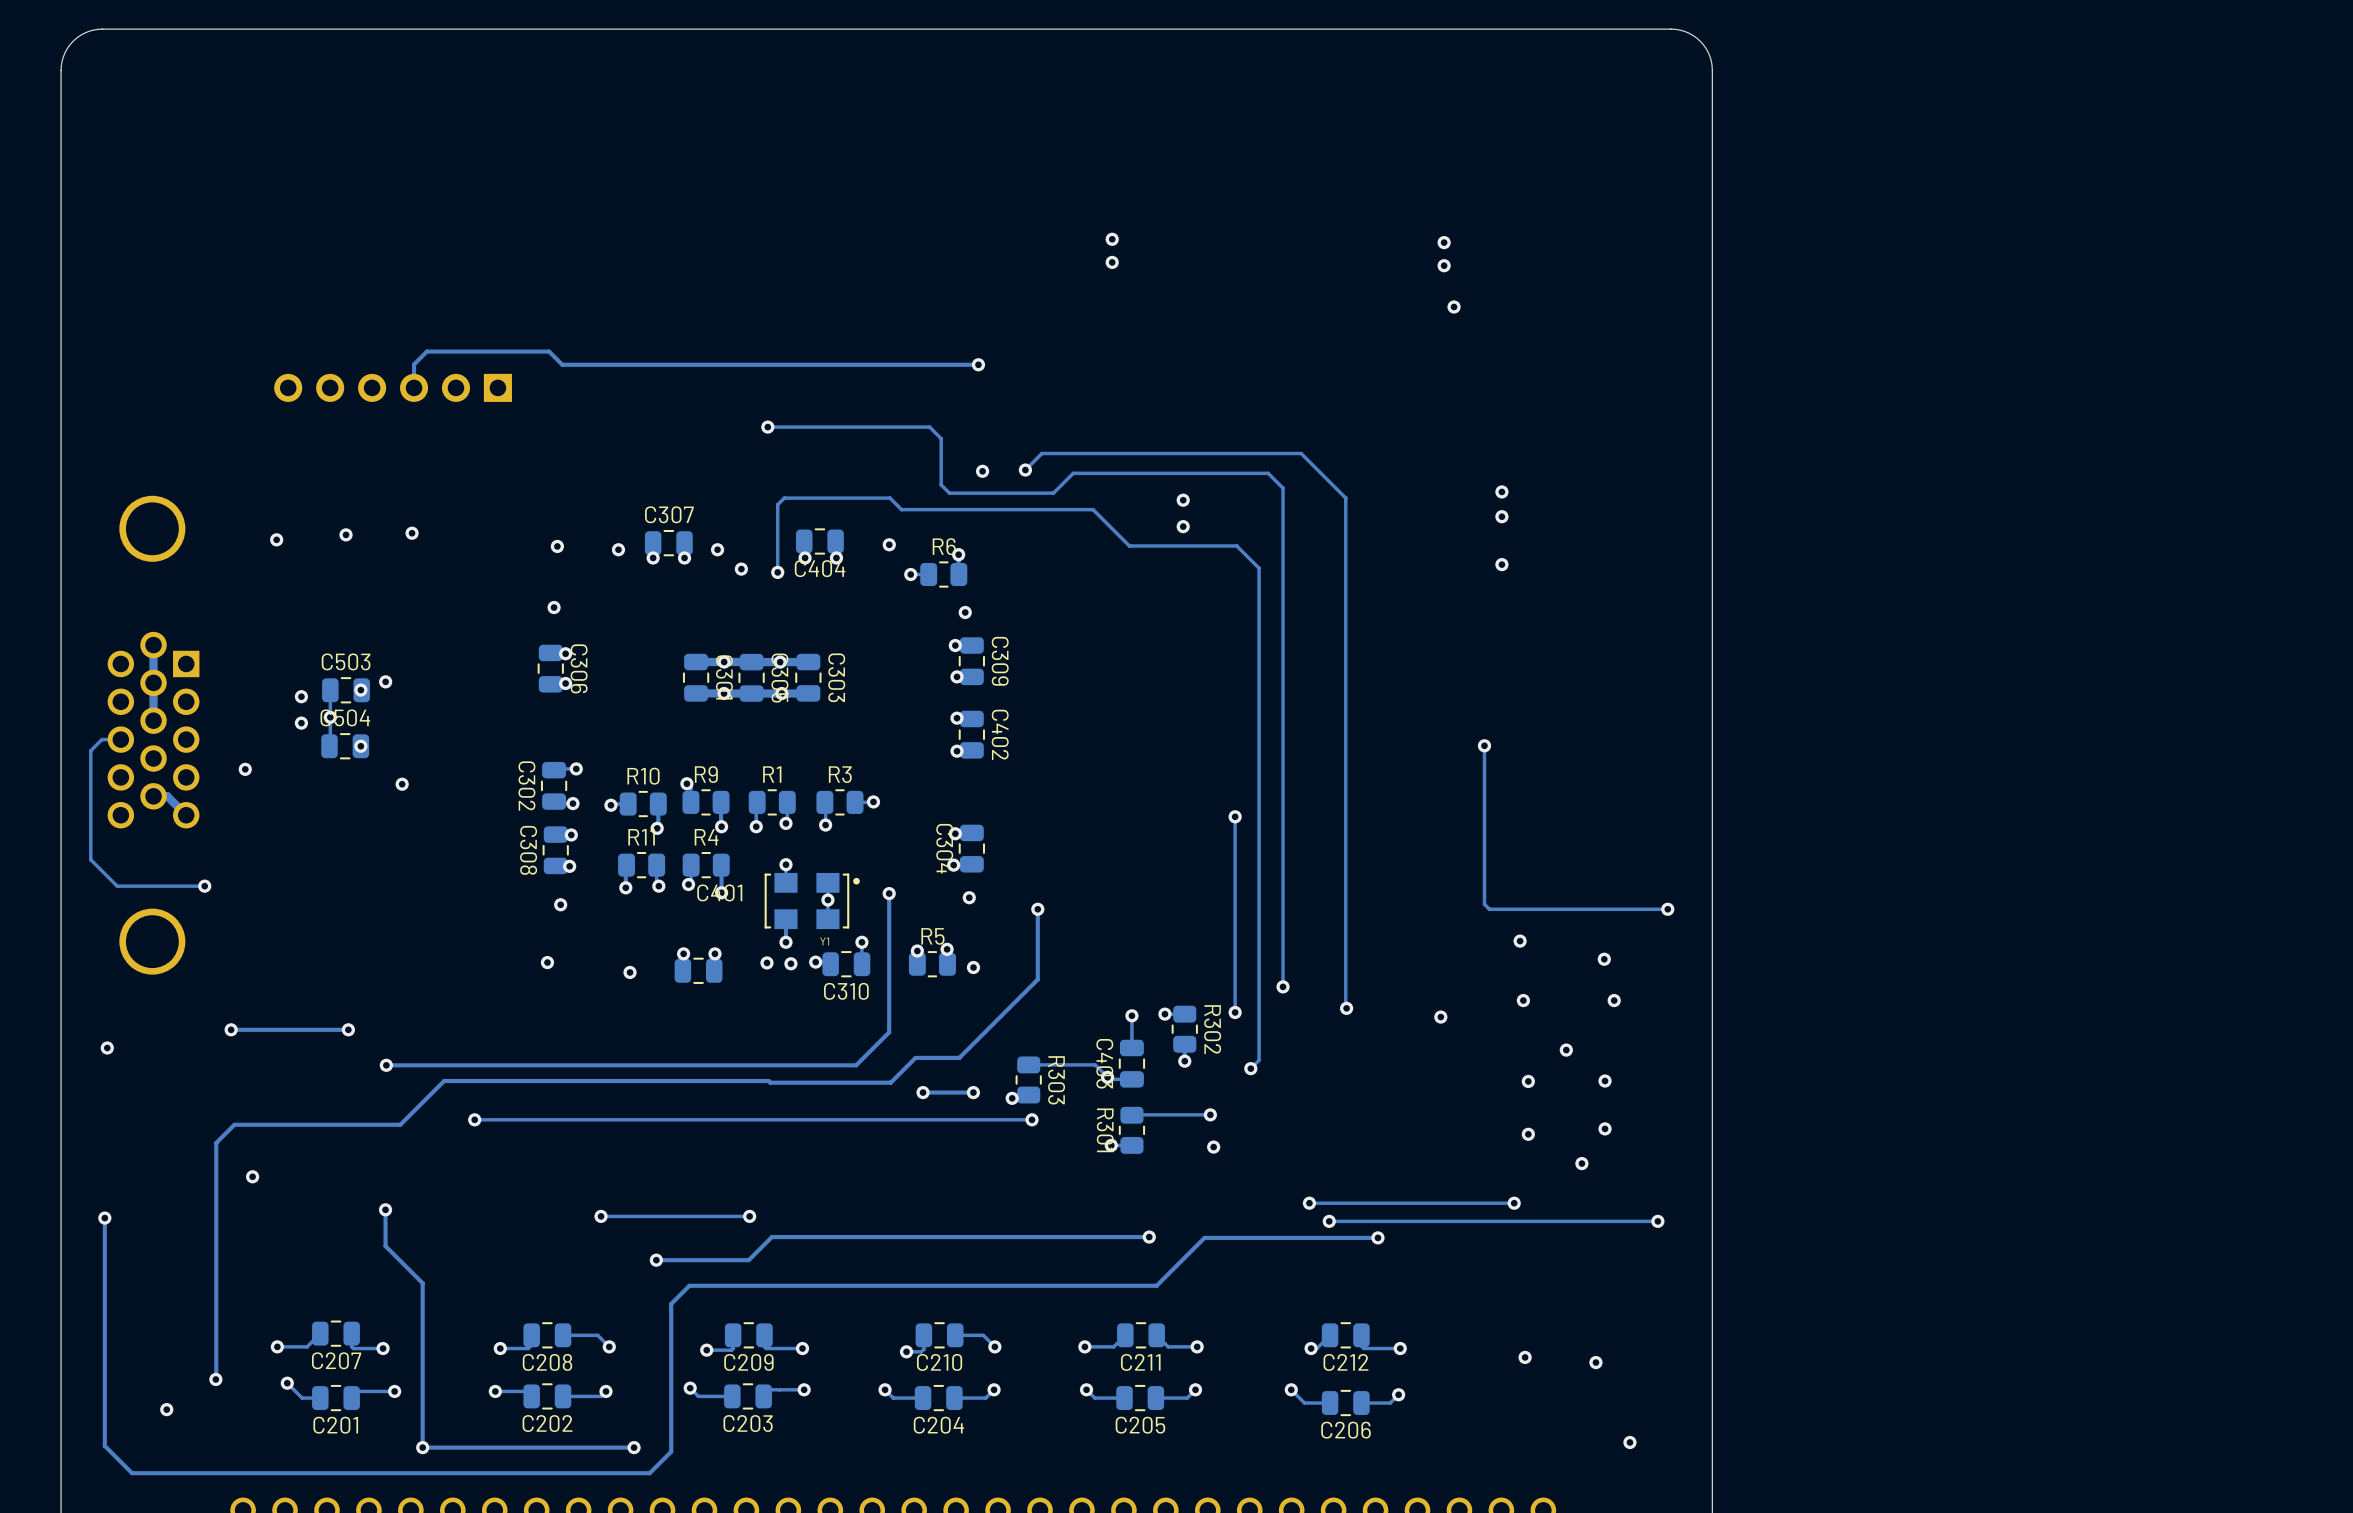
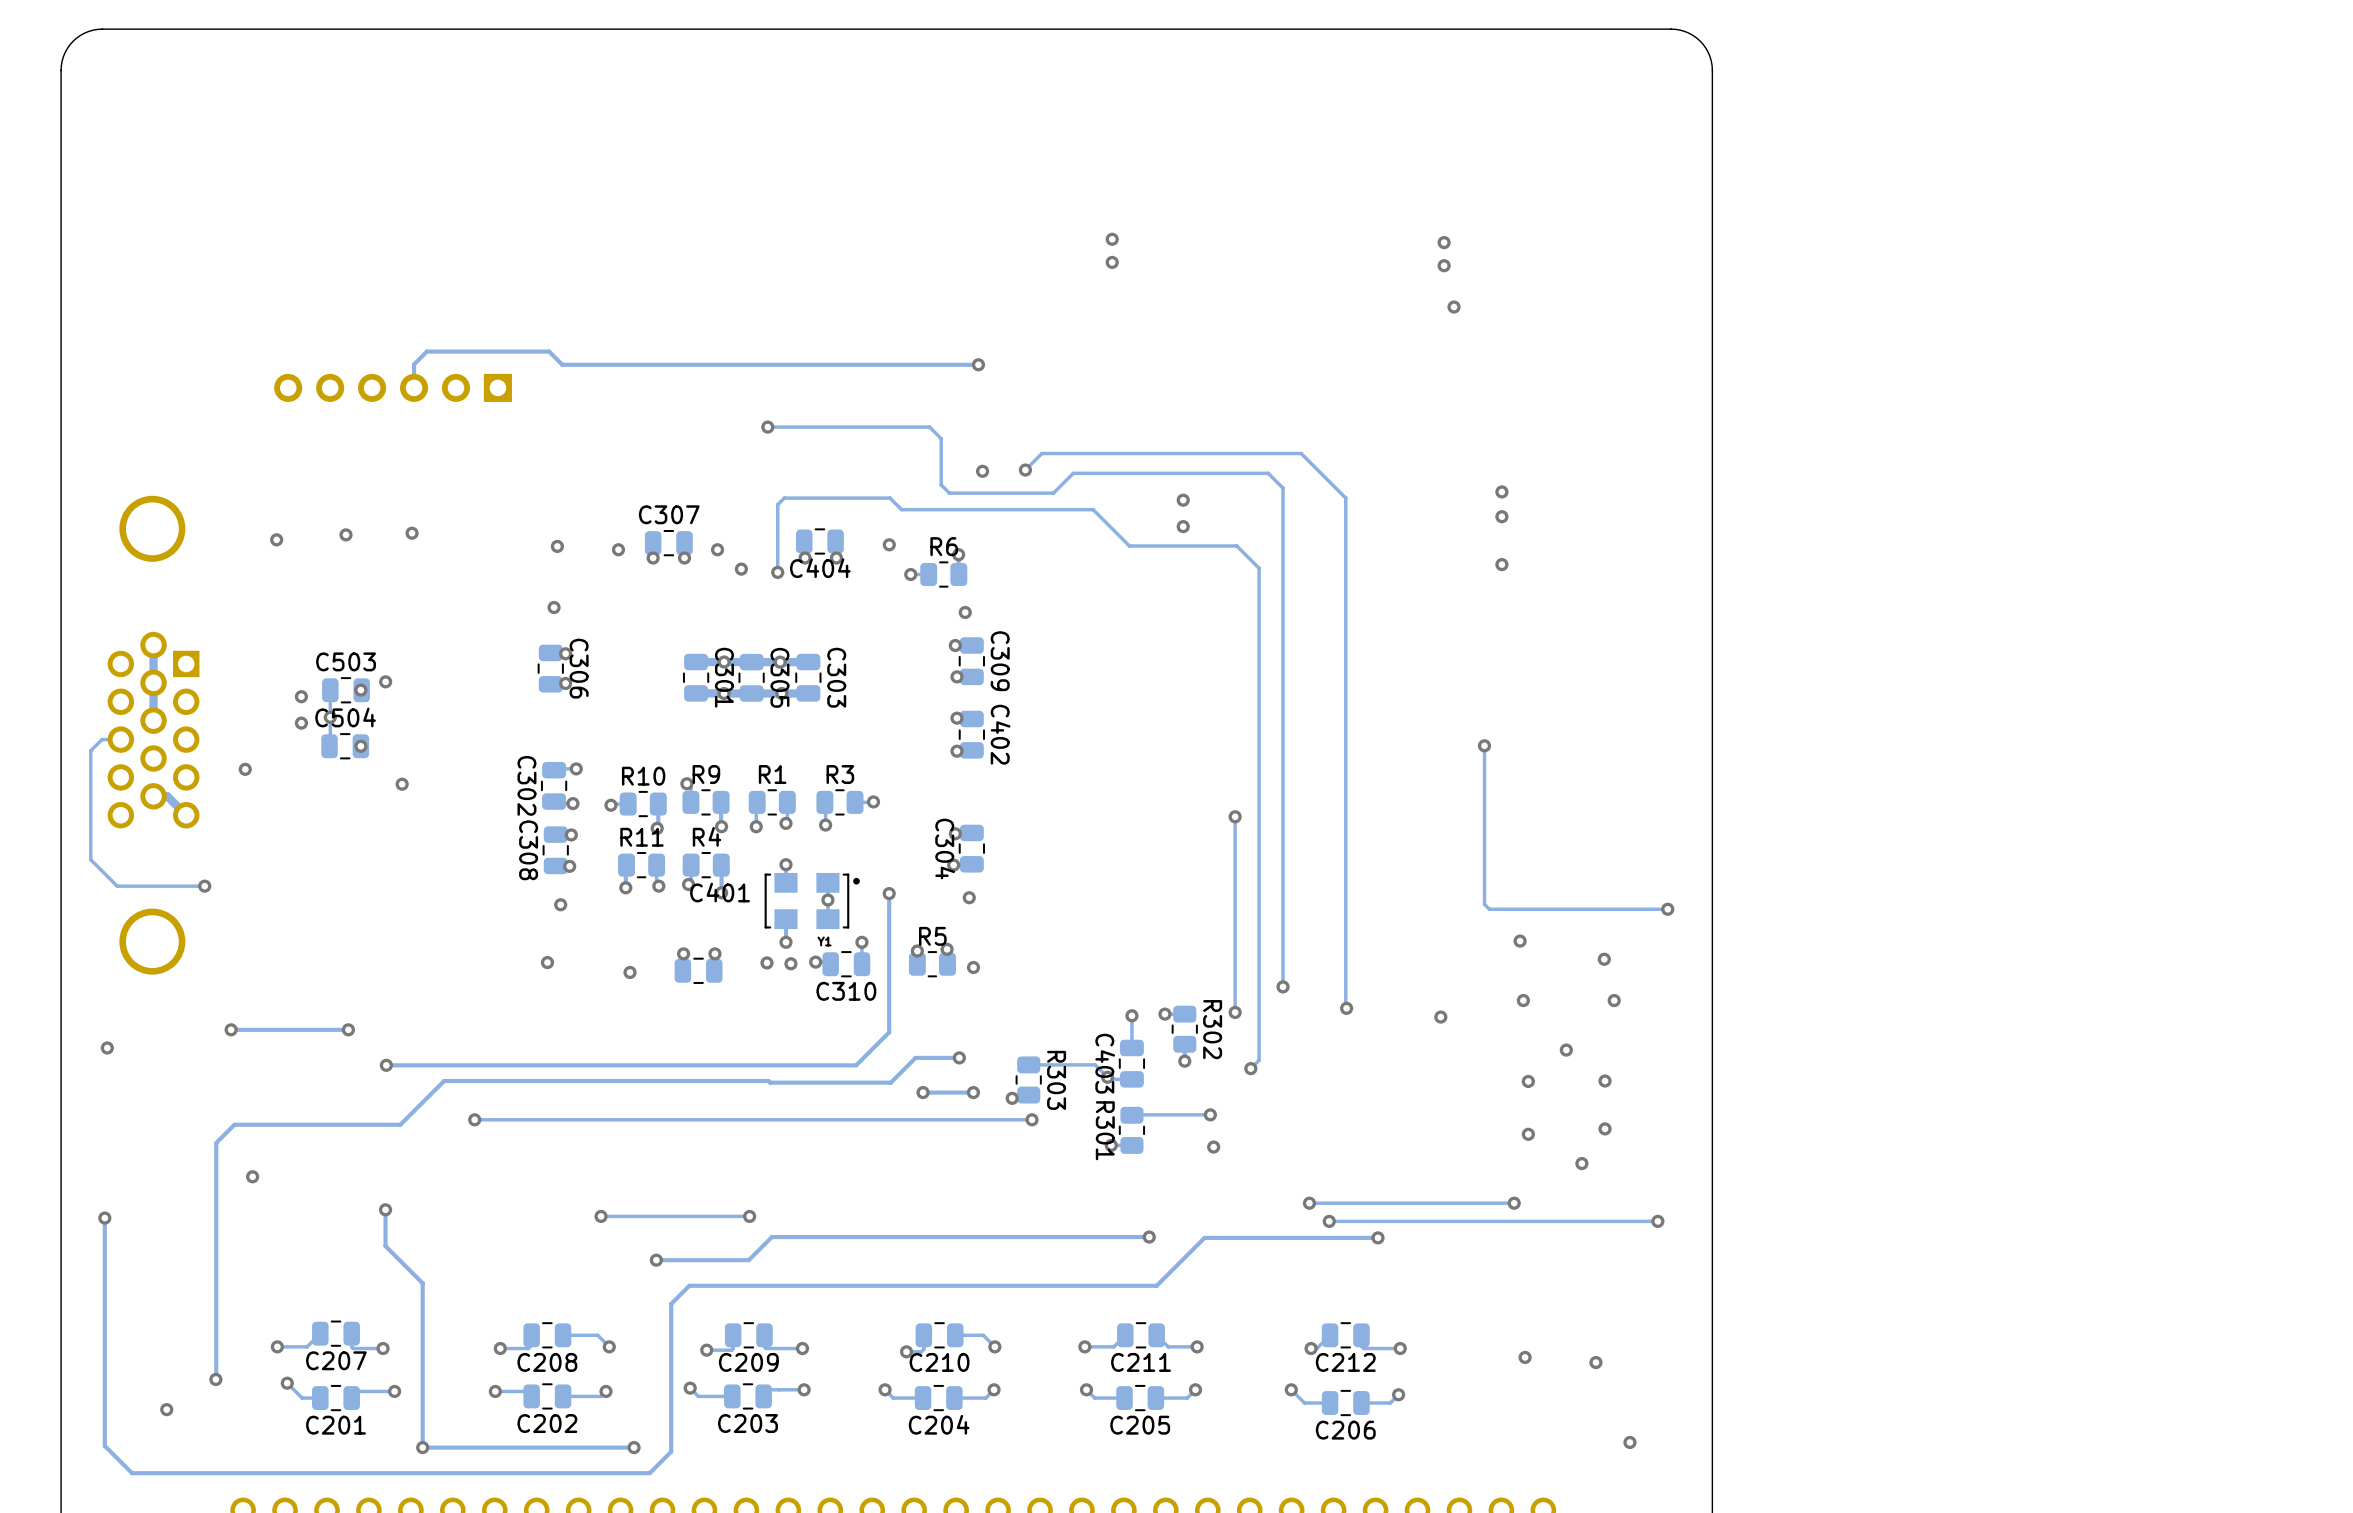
track: (1037, 909) (1037, 979) (959, 1057) -> none
via: (1037, 909) -> none
via: none -> (959, 1057)

